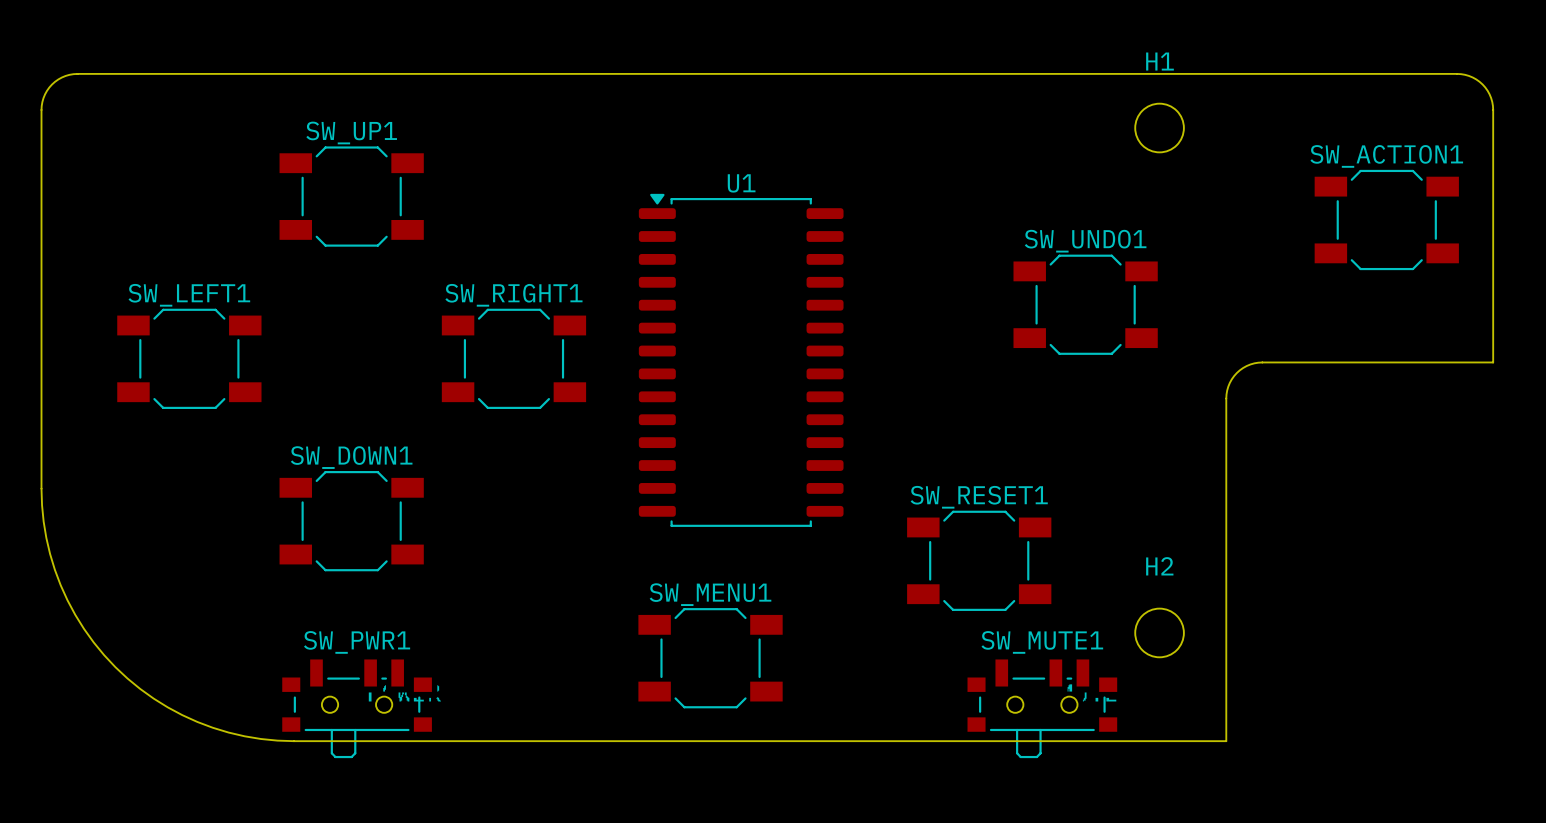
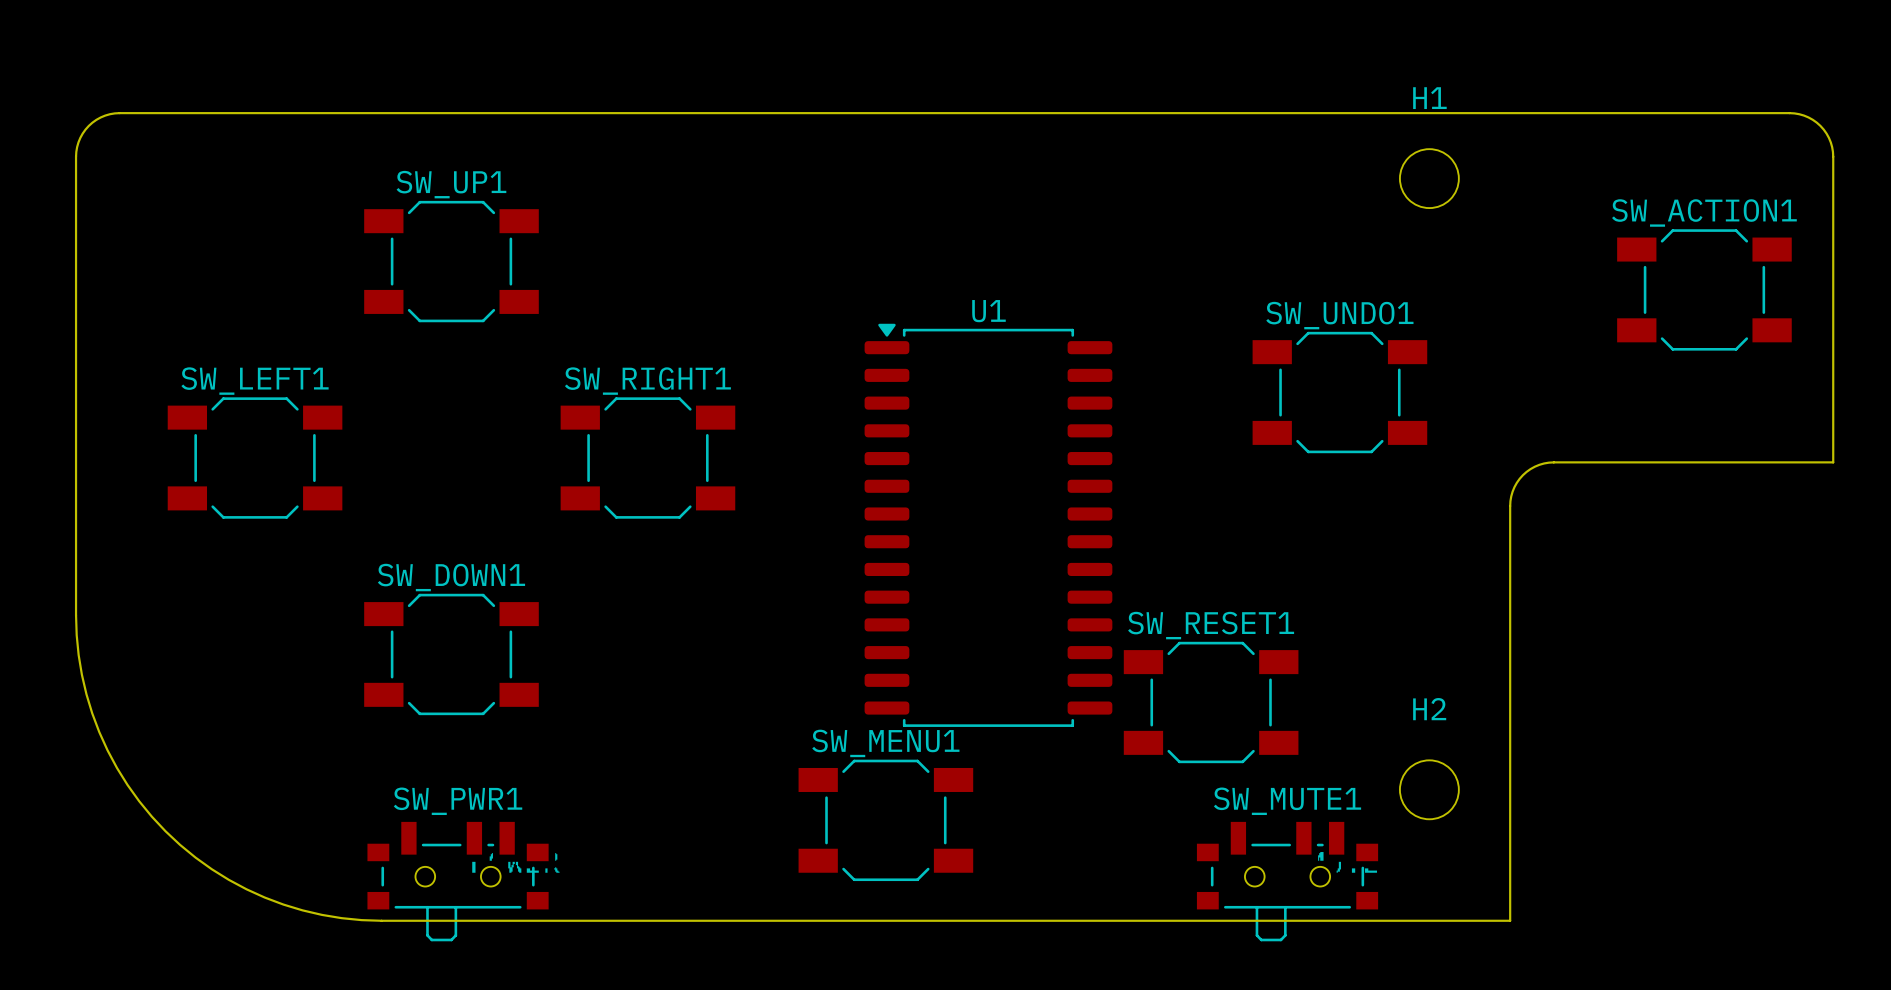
U1 position: (741, 360) -> (988, 525)

